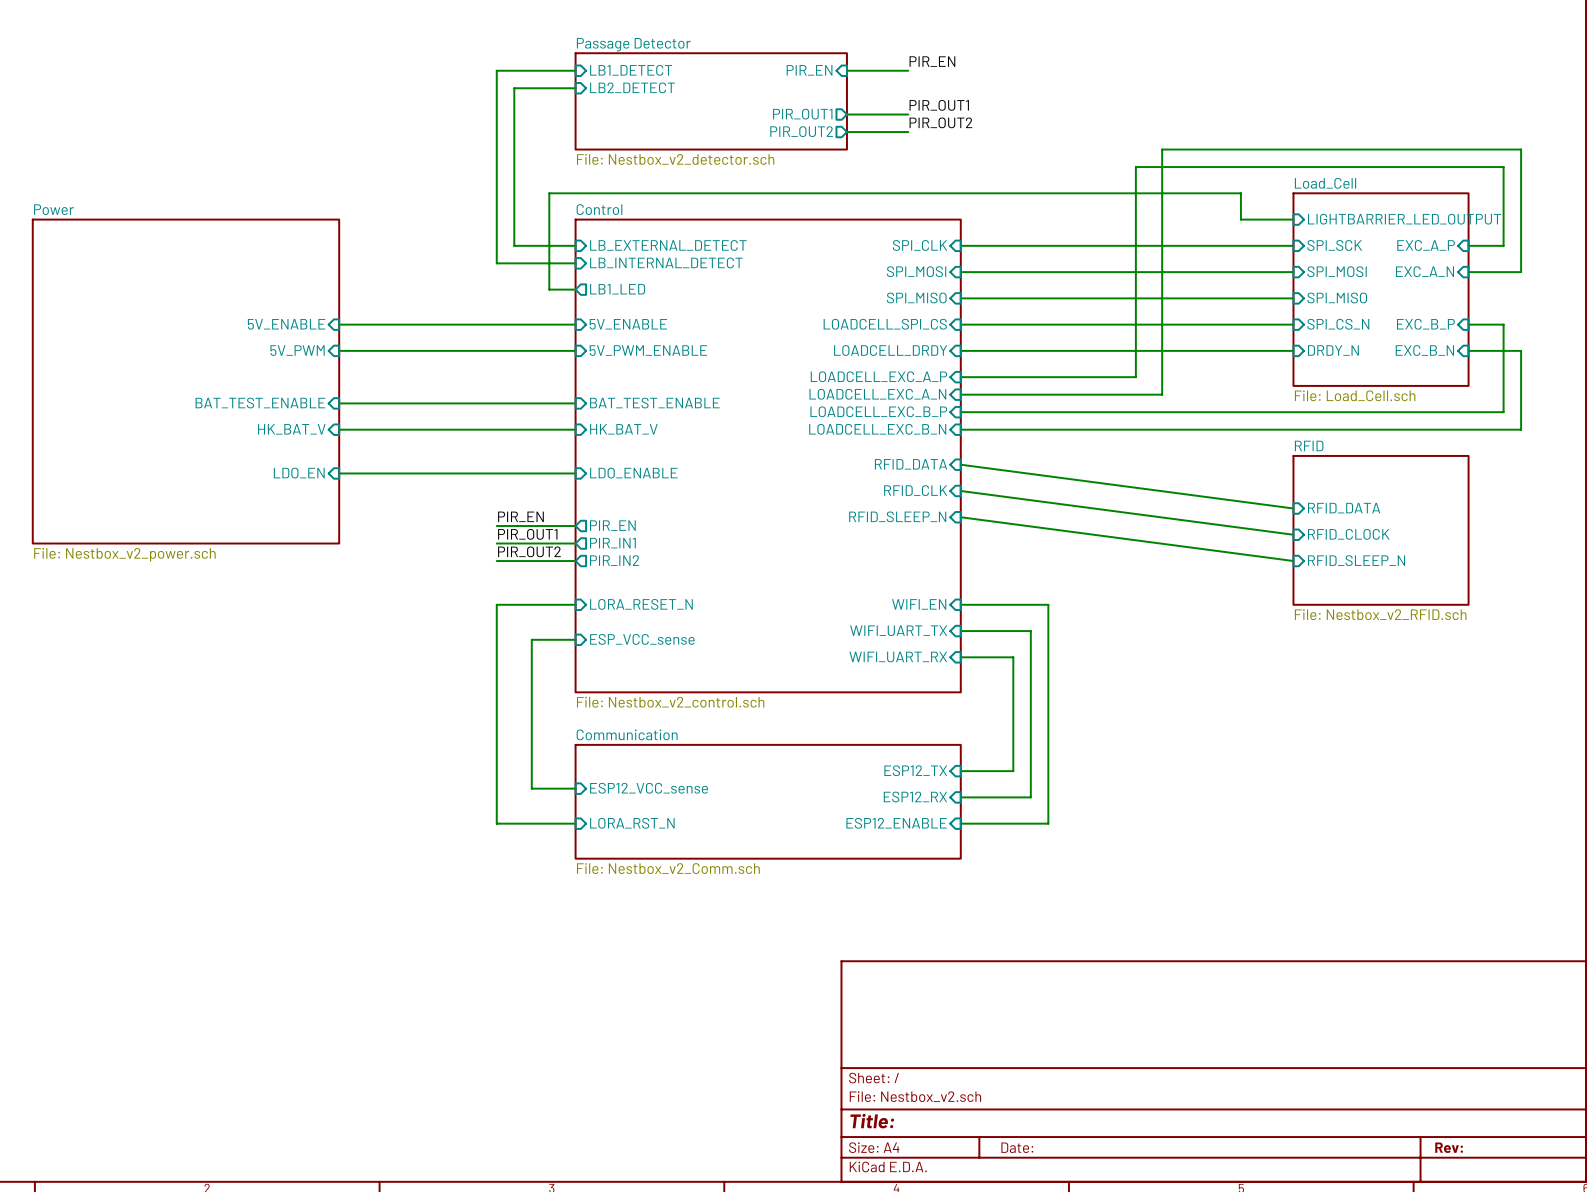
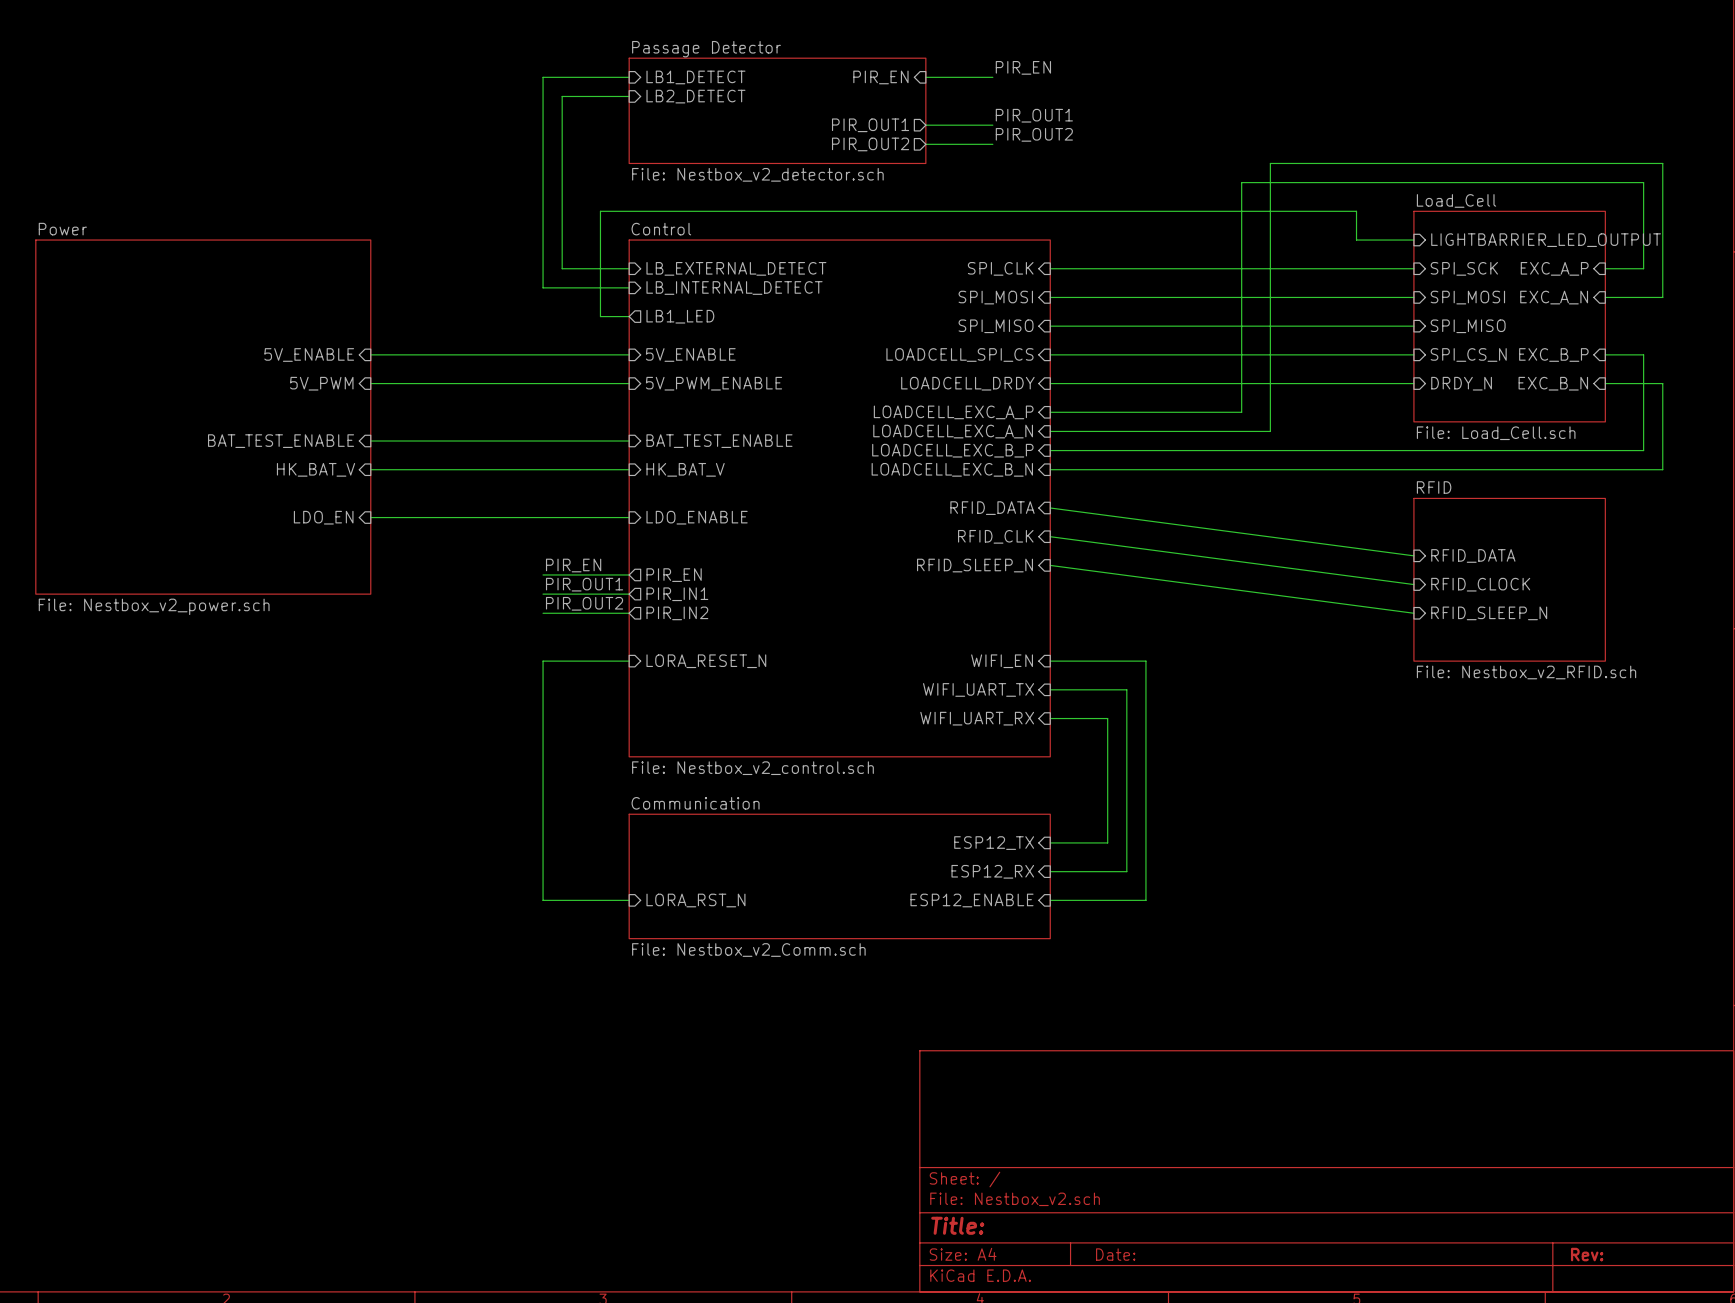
wire: (575, 639) (531, 639) (531, 788) (575, 788) -> none
sheet pin: ESP_VCC_sense (642, 639) -> none
sheet pin: ESP12_VCC_sense (649, 788) -> none

